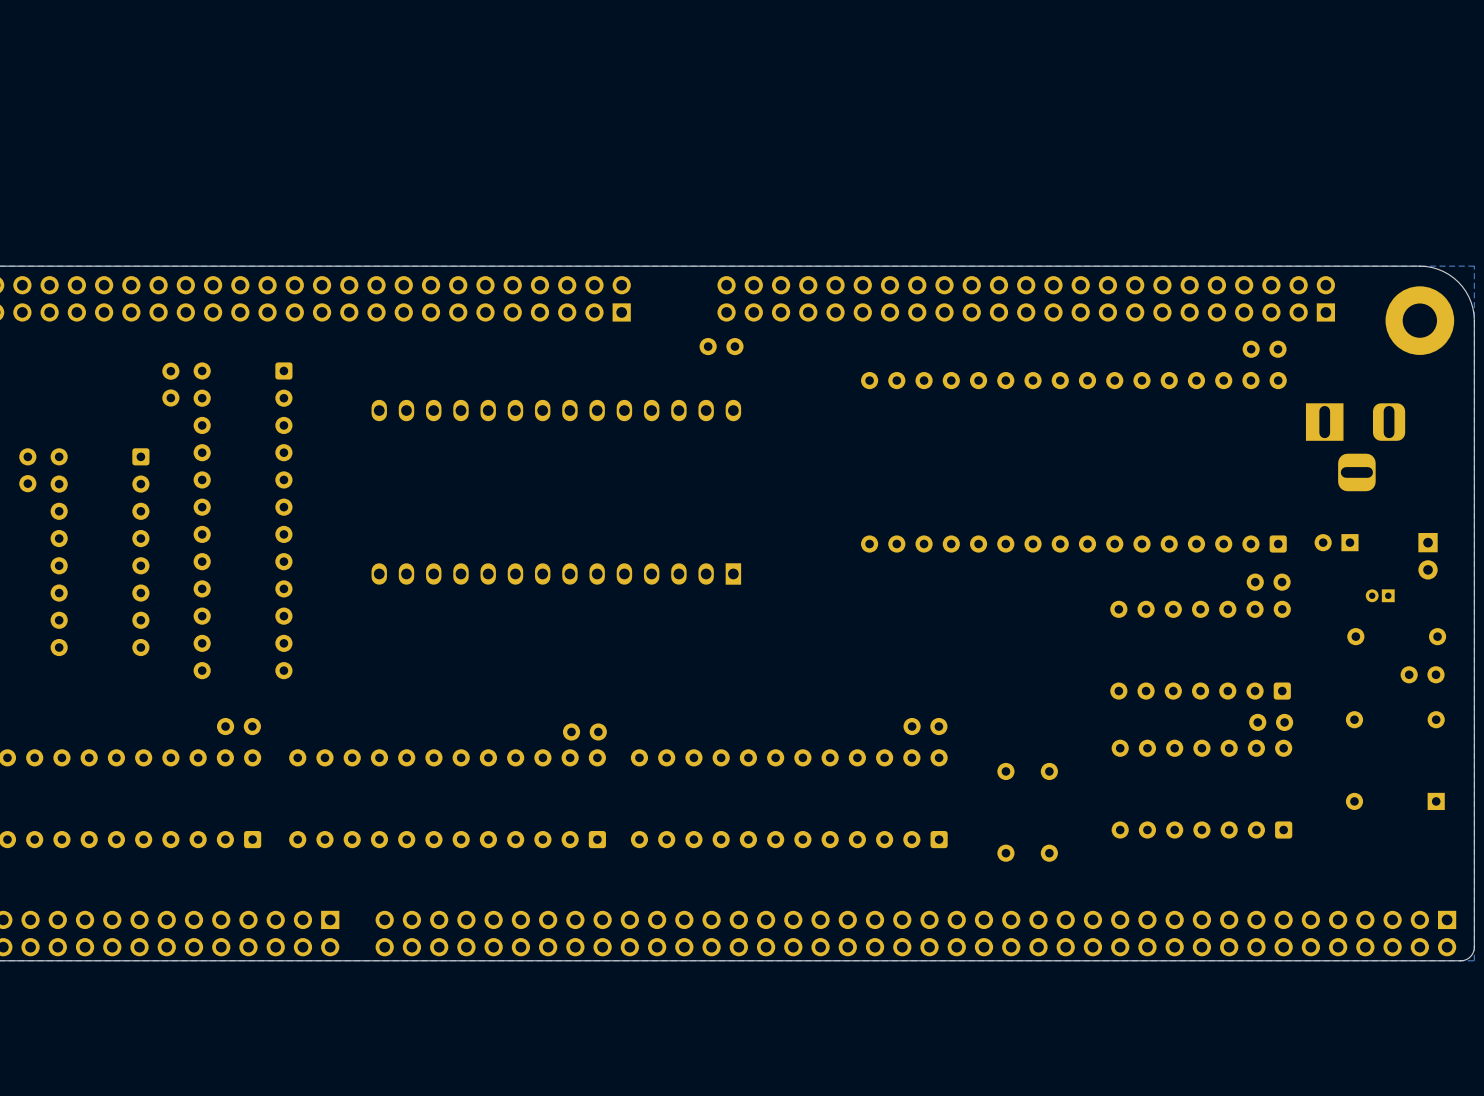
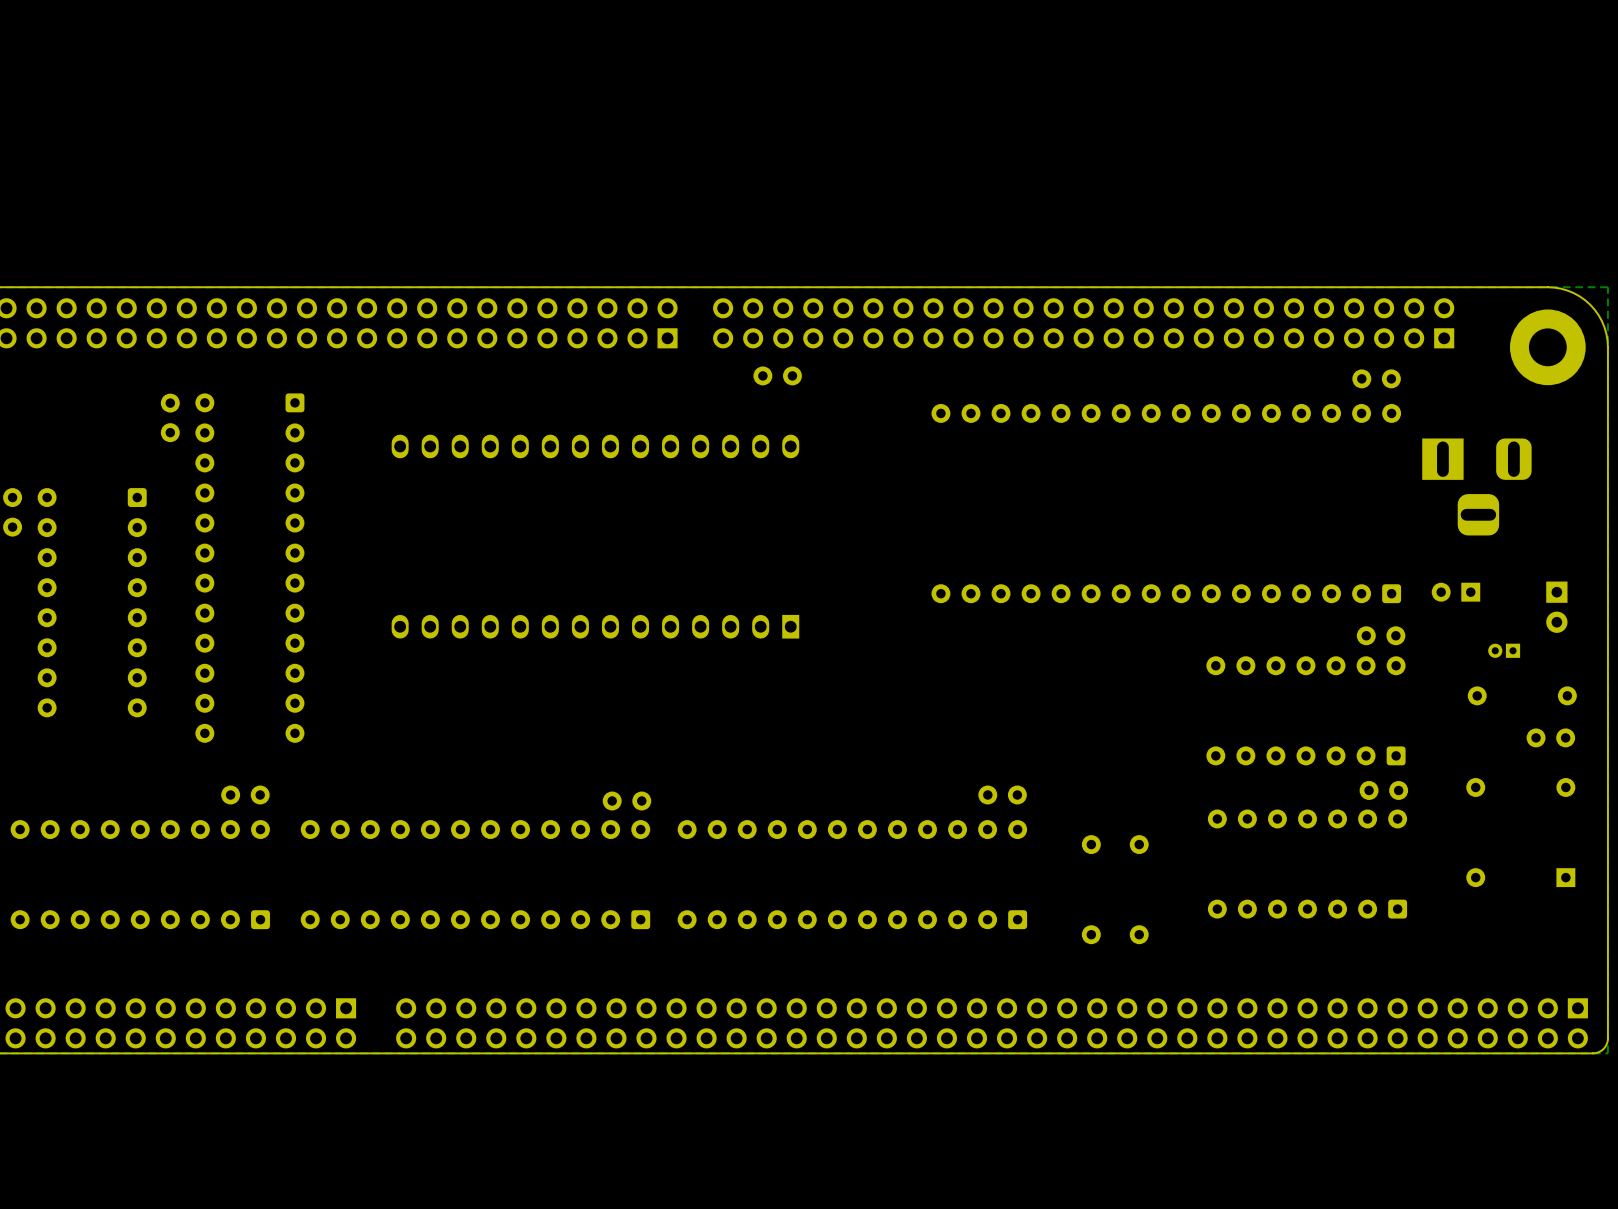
part: none -> (1083, 323)

